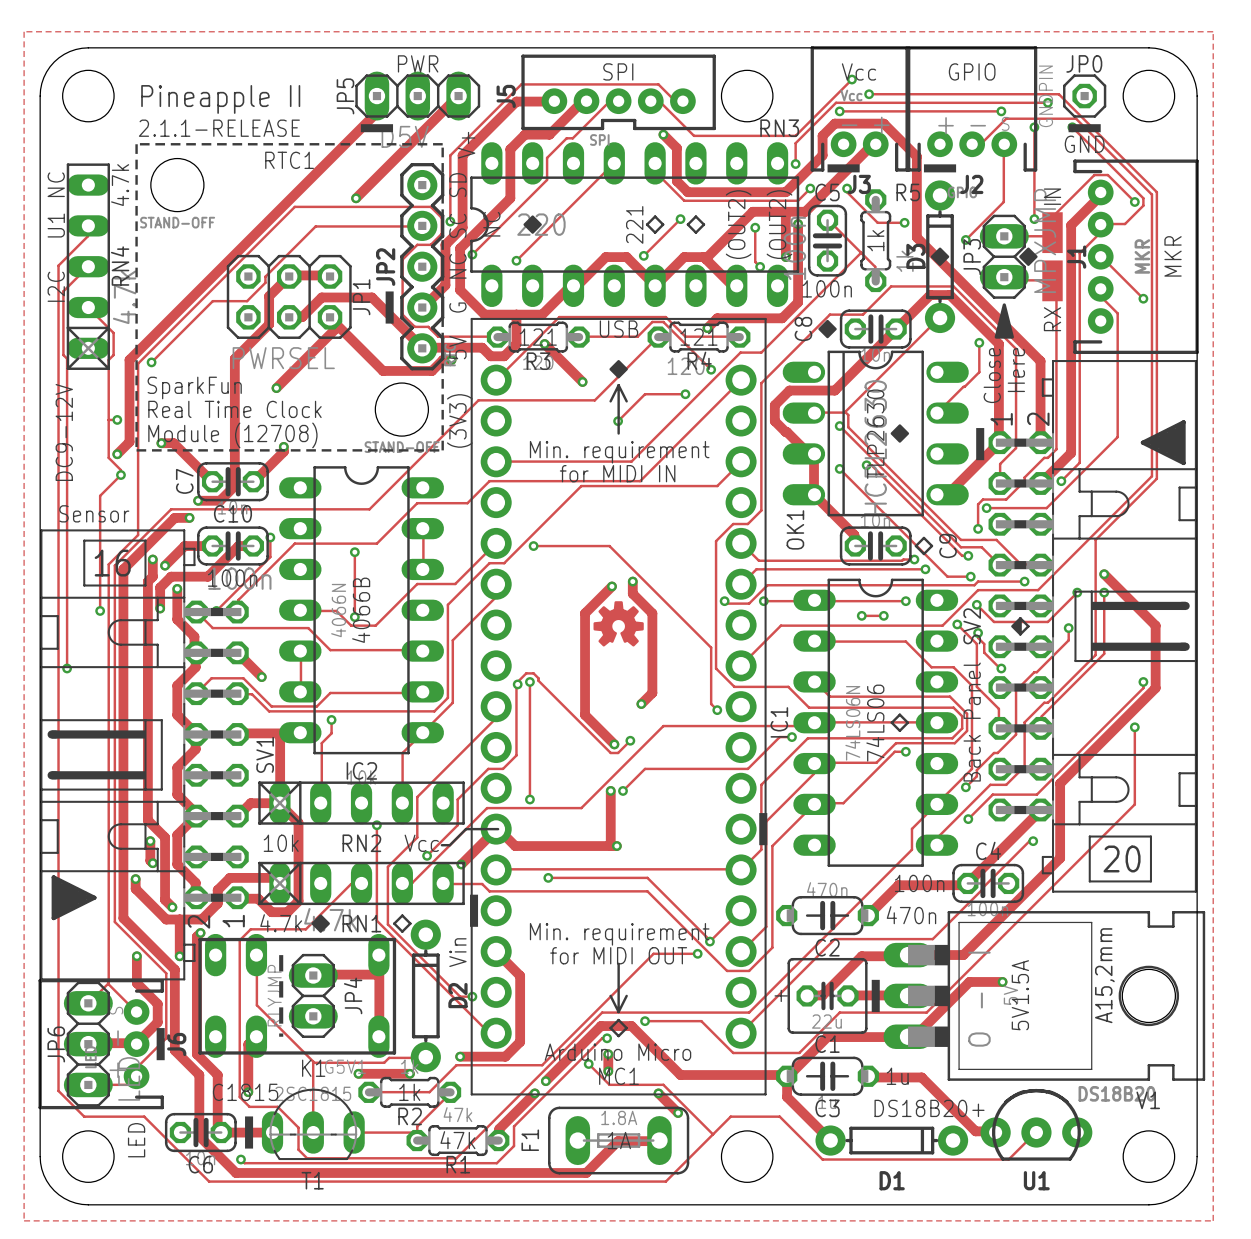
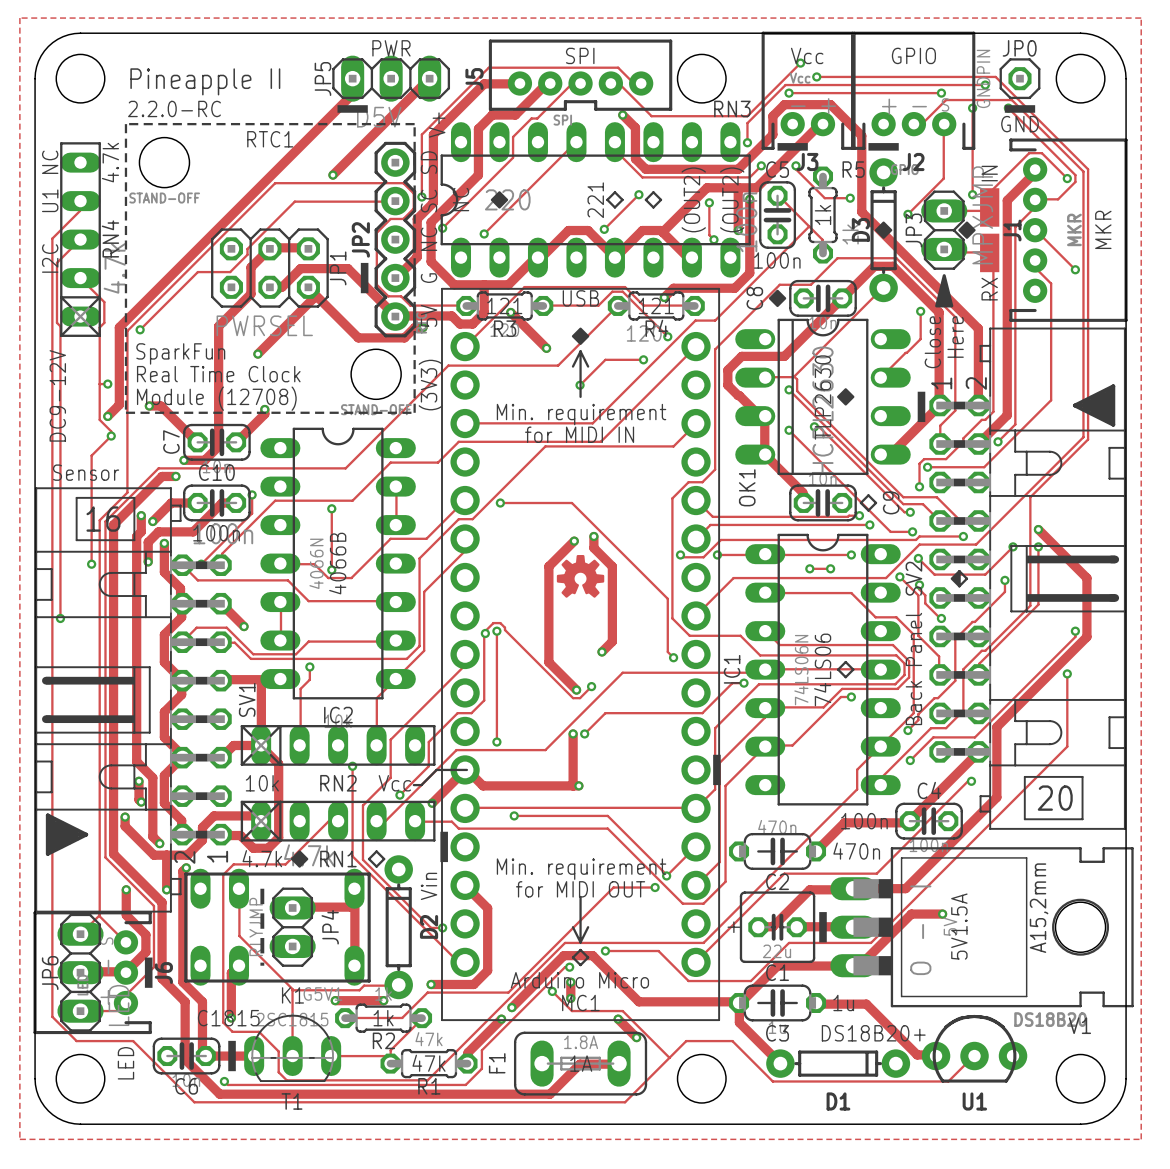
text: 2.1.1-RELEASE (219, 128) -> 2.2.0-RC (174, 108)

